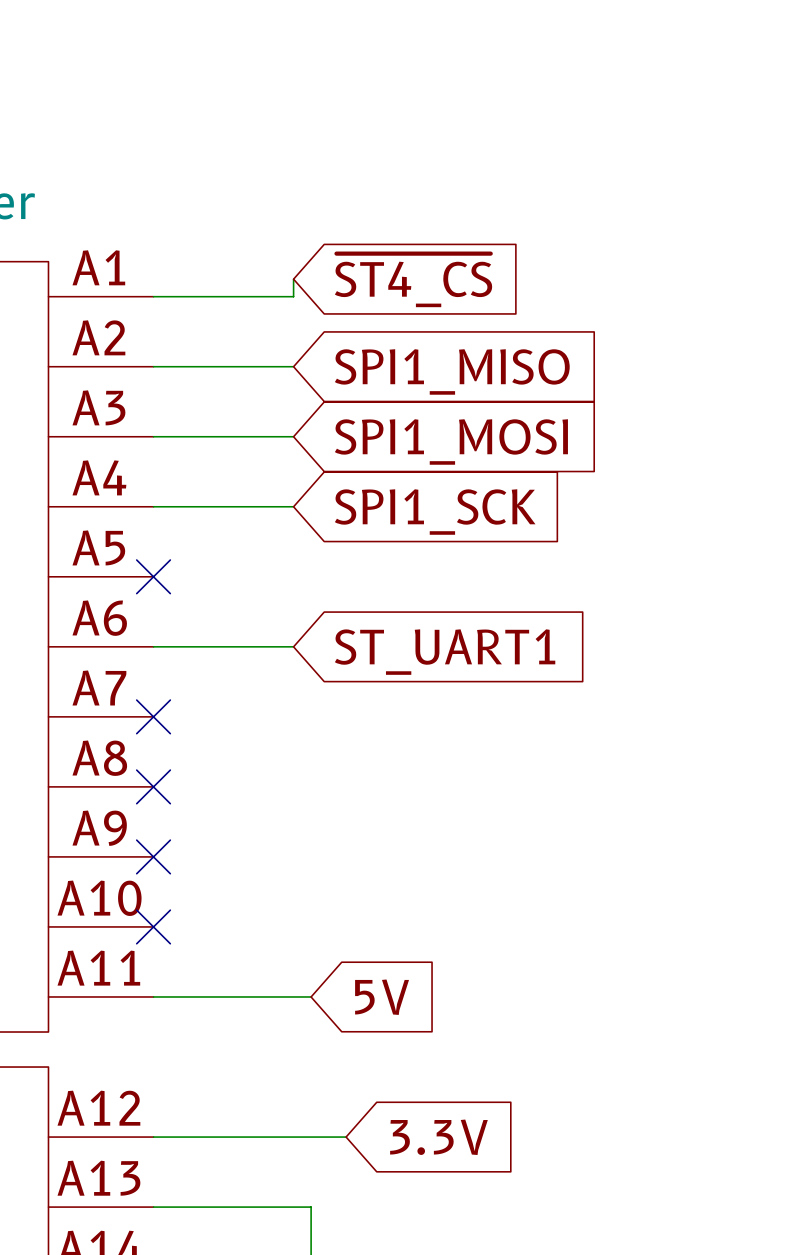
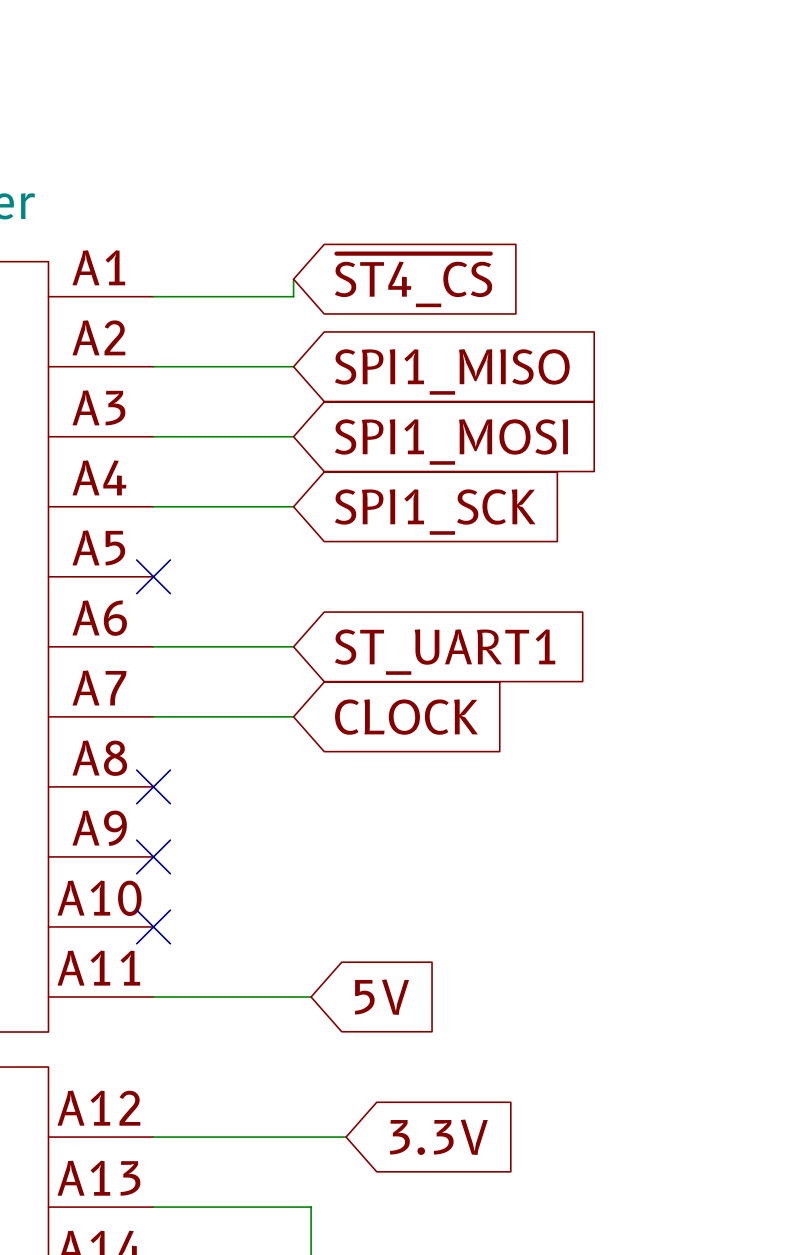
wire: none -> (153, 716) (293, 716)
no-connect mark: (153, 716) -> none
global label: none -> CLOCK (406, 717)

